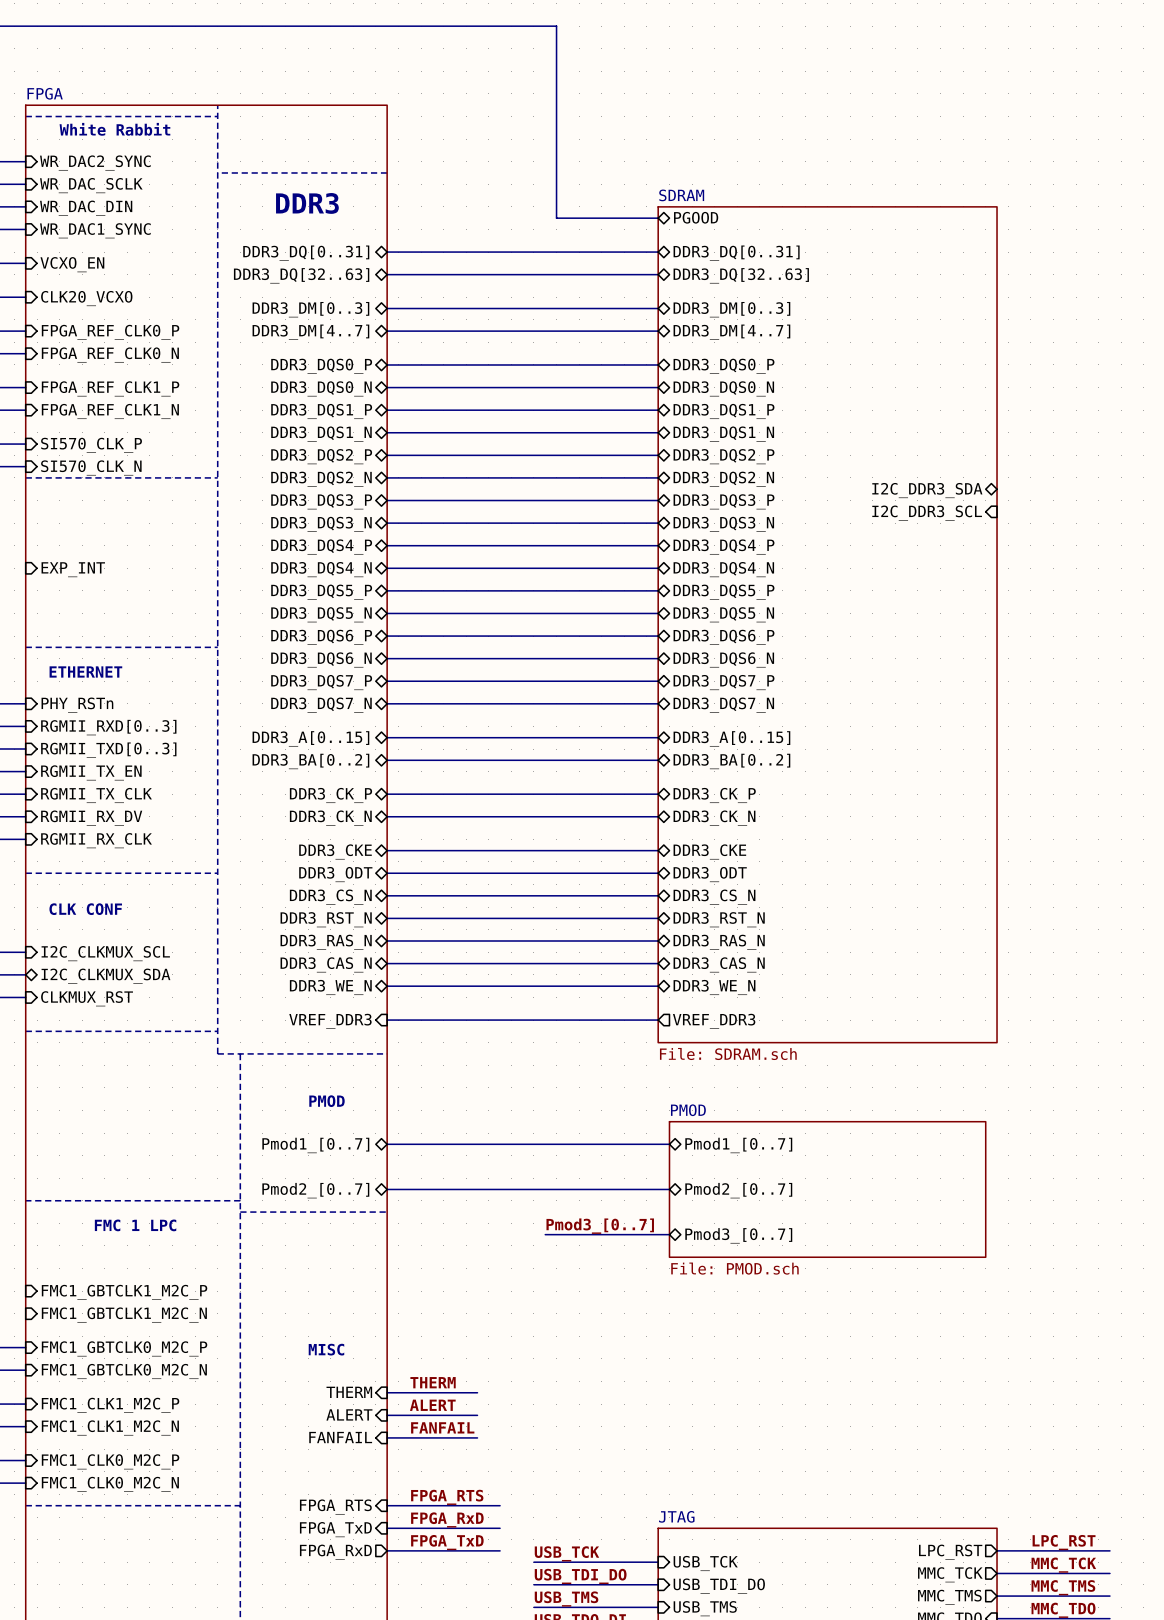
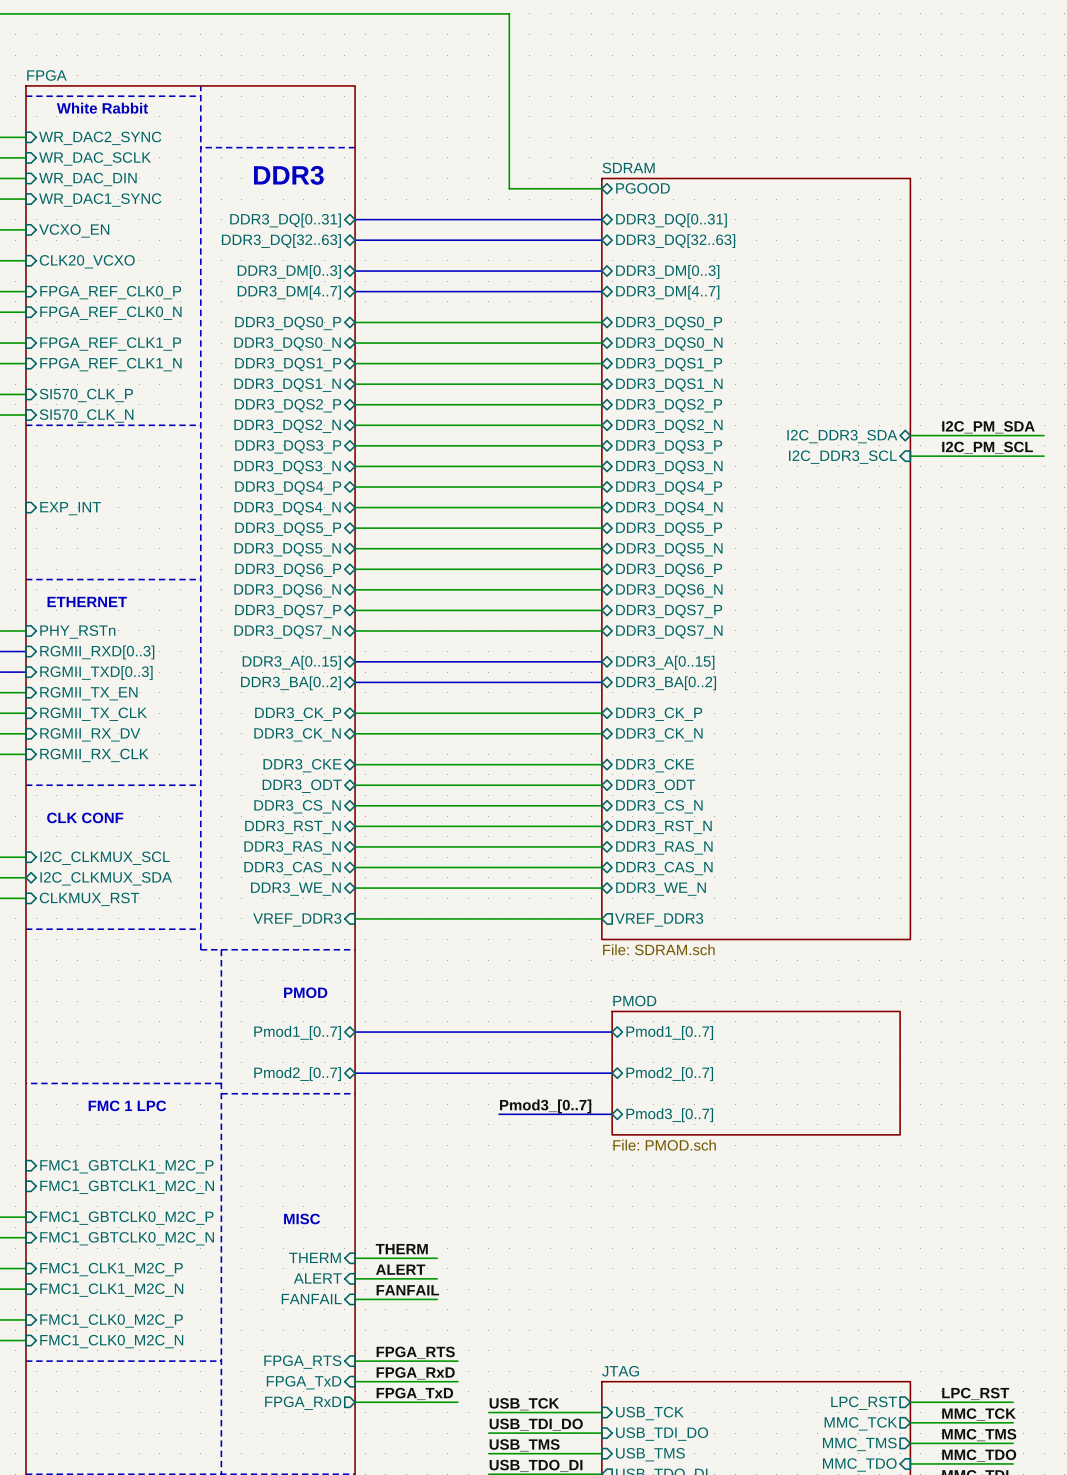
label: none -> I2C_PM_SDA (988, 427)
wire: none -> (910, 435) (1044, 435)
label: none -> I2C_PM_SCL (987, 447)
wire: none -> (910, 456) (1044, 456)

